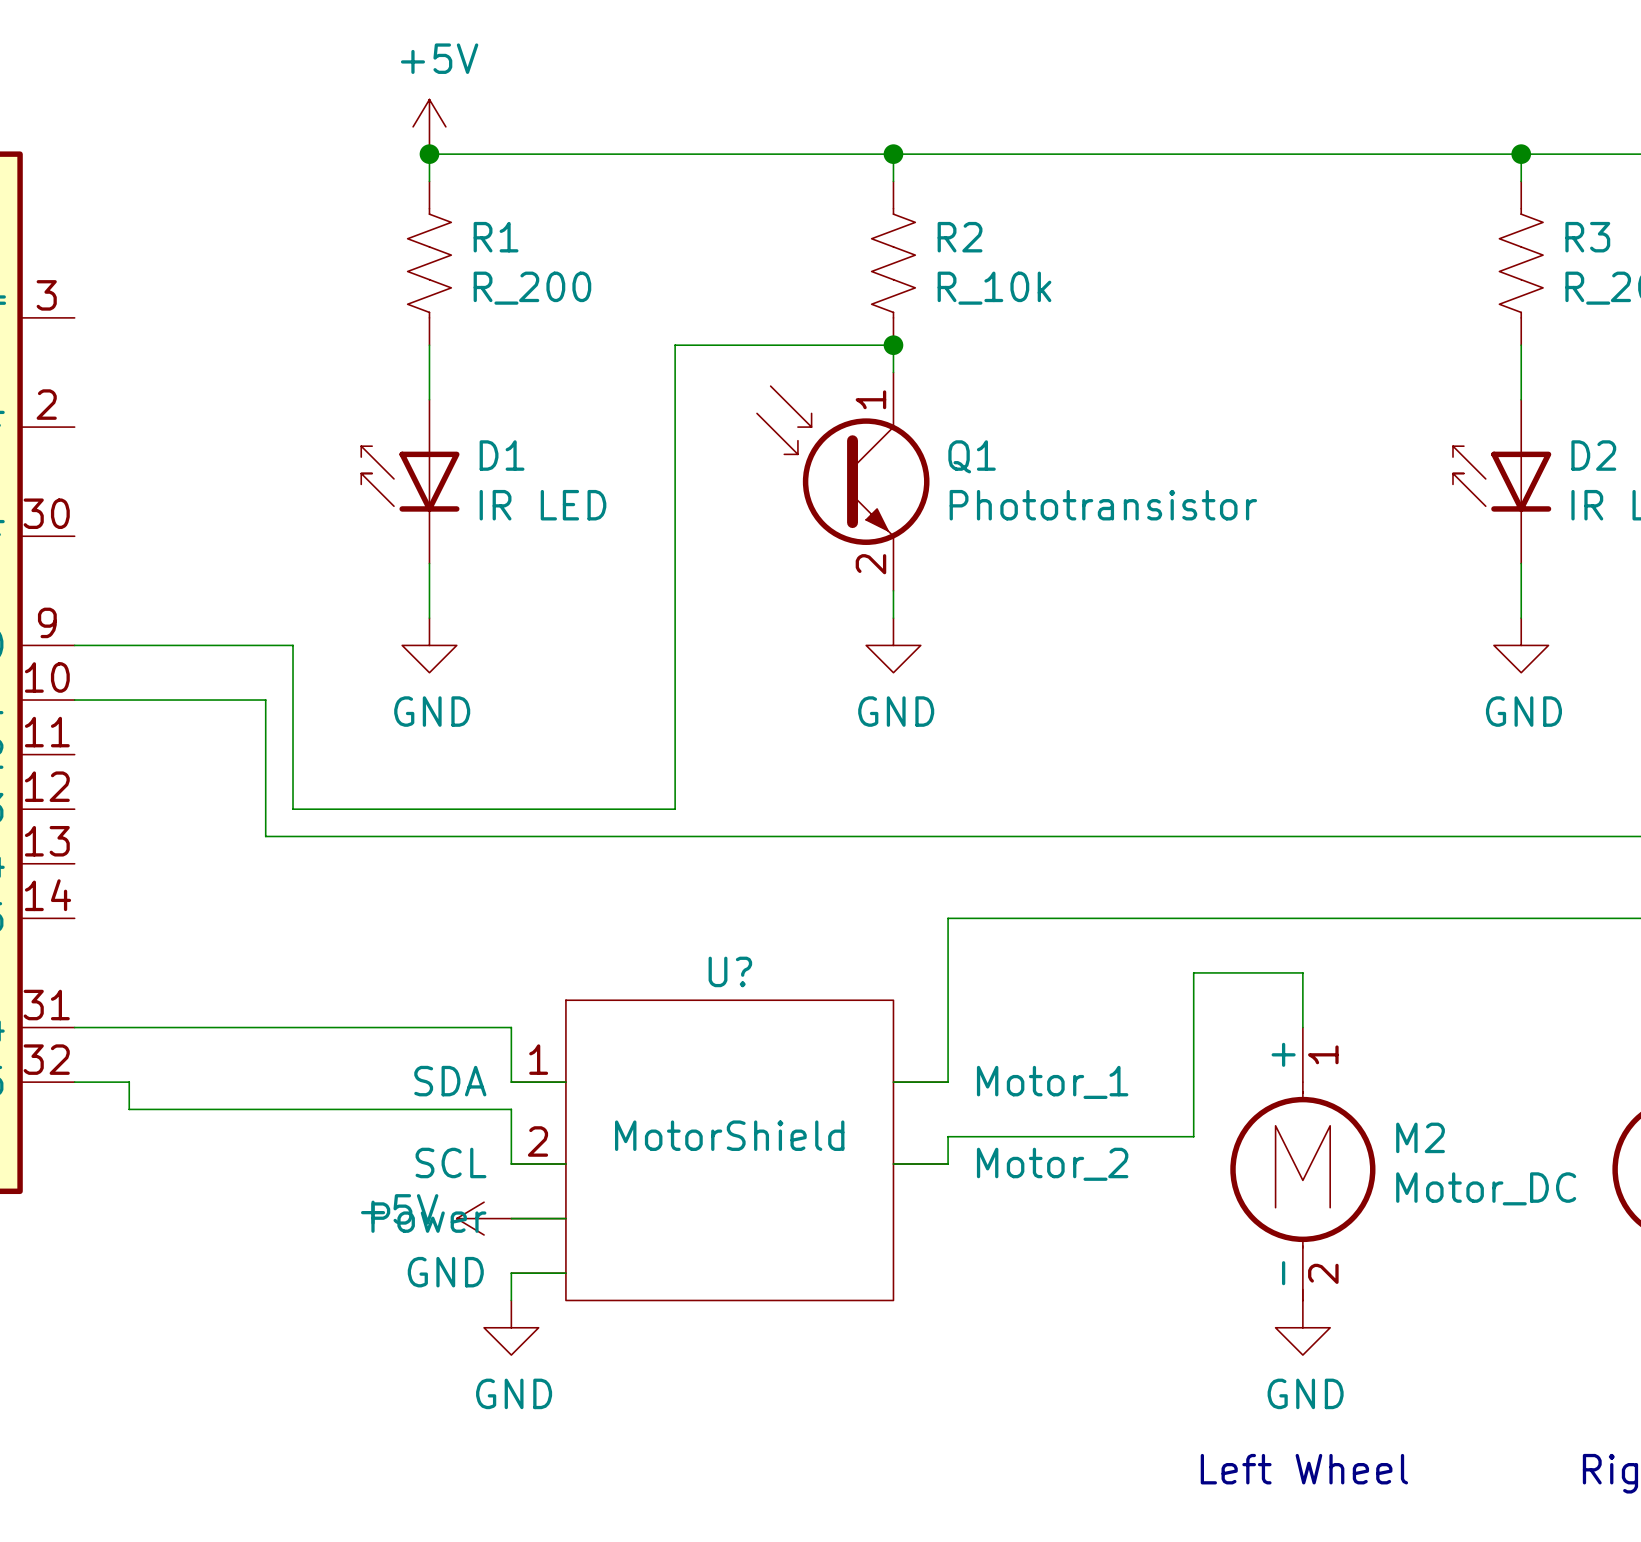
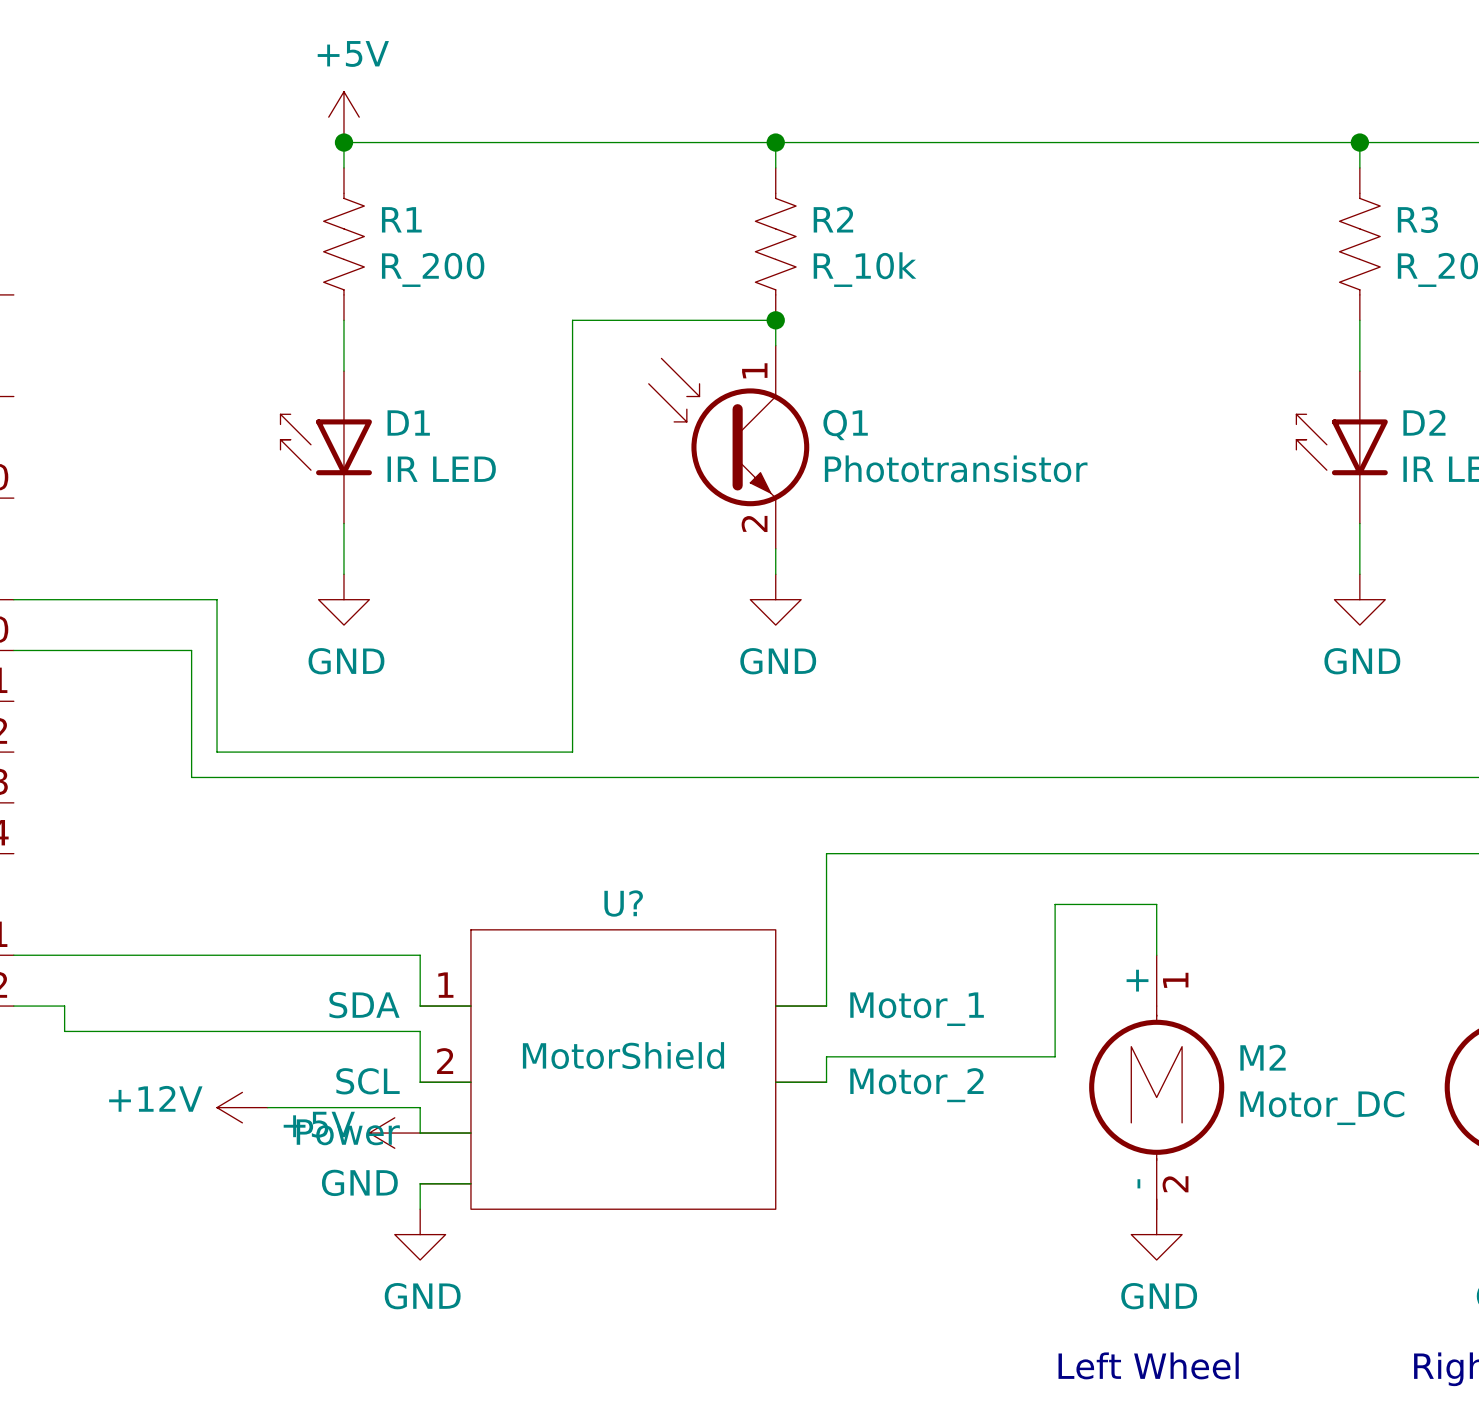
power symbol: none -> +12V (242, 1107)
wire: none -> (267, 1107) (420, 1107) (420, 1133)

